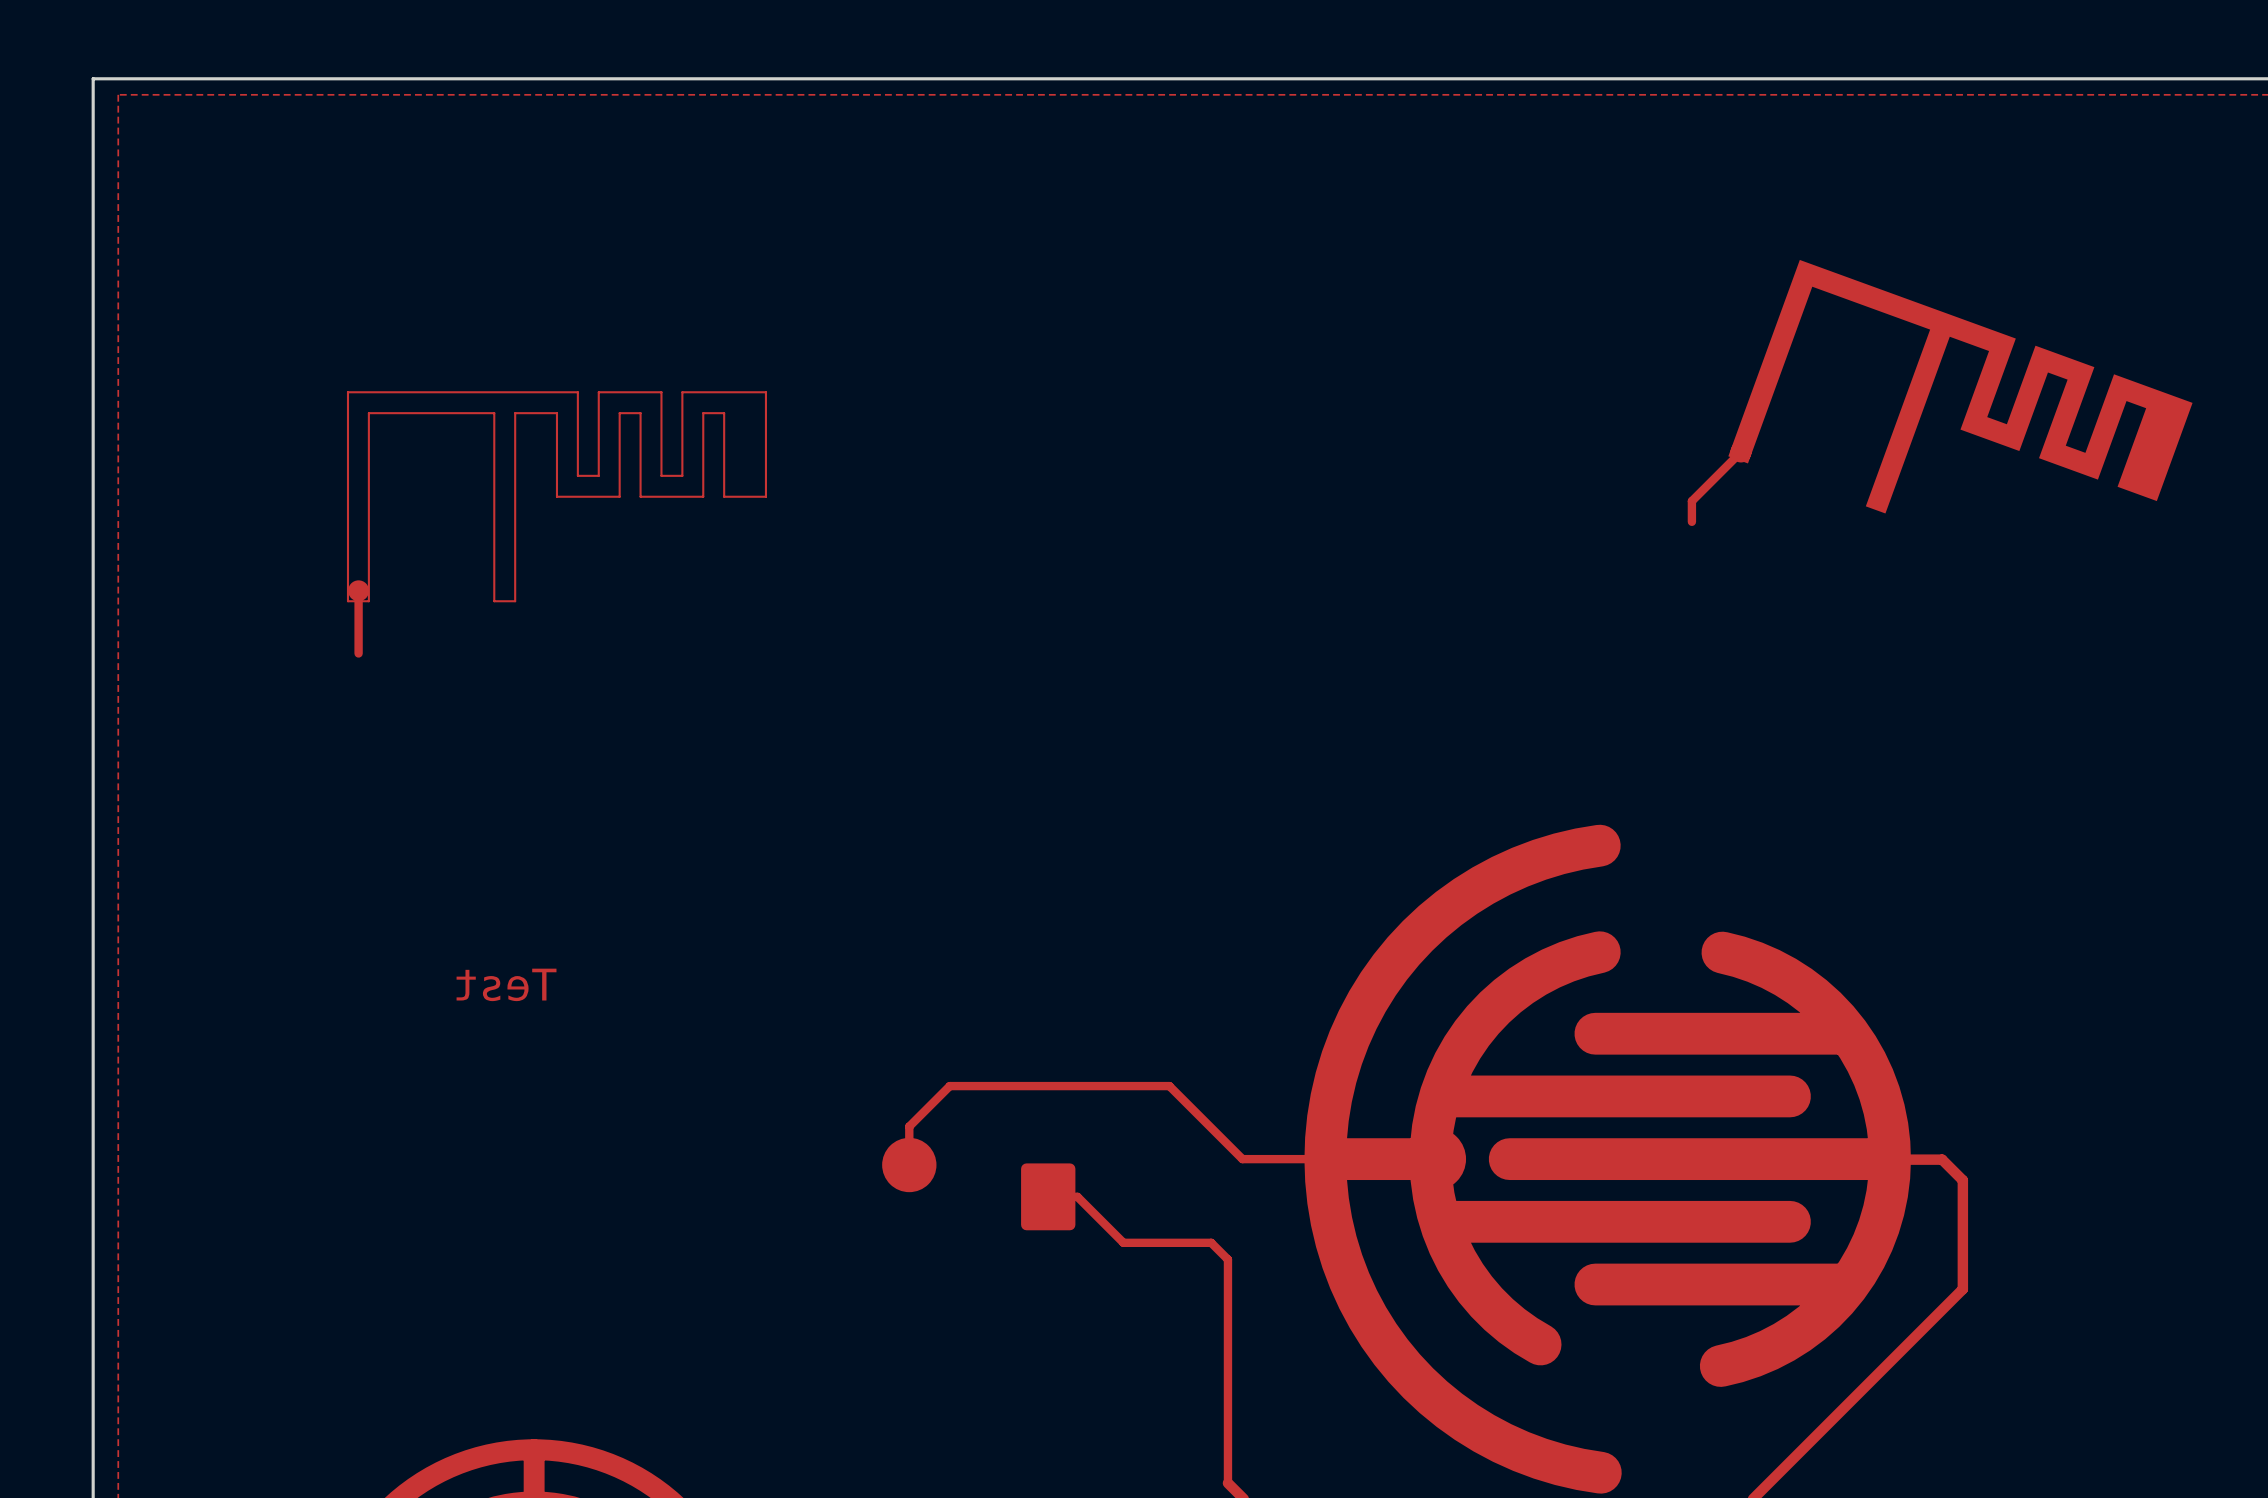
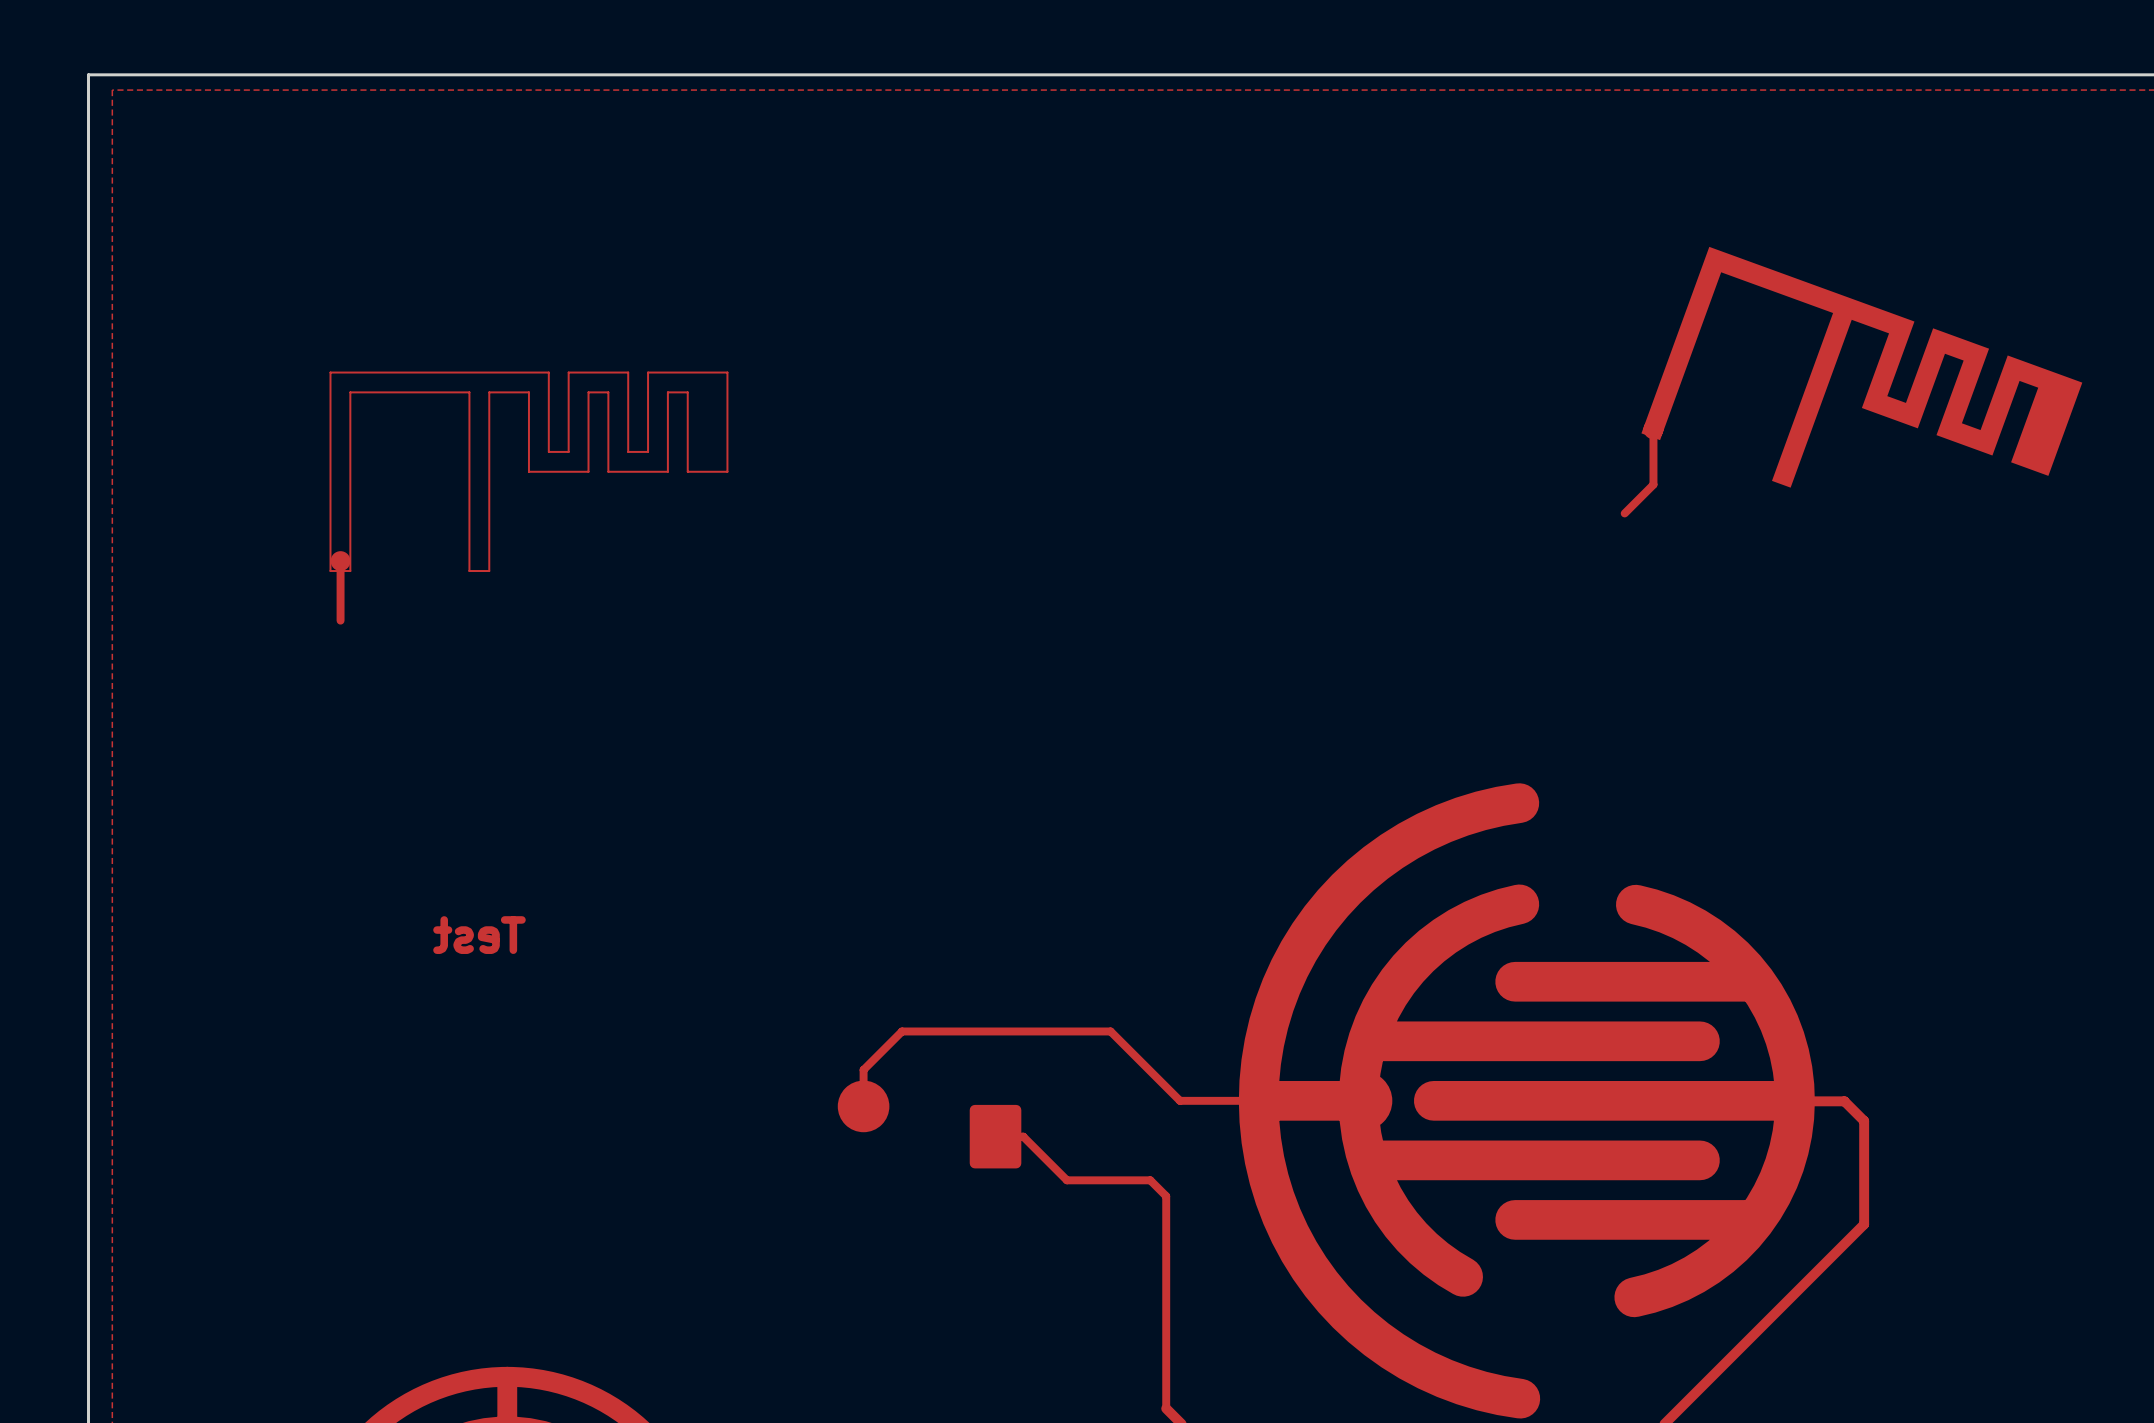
top track: (1741, 452) (1691, 501) (1691, 521) -> (1653, 429) (1653, 484) (1624, 513)

